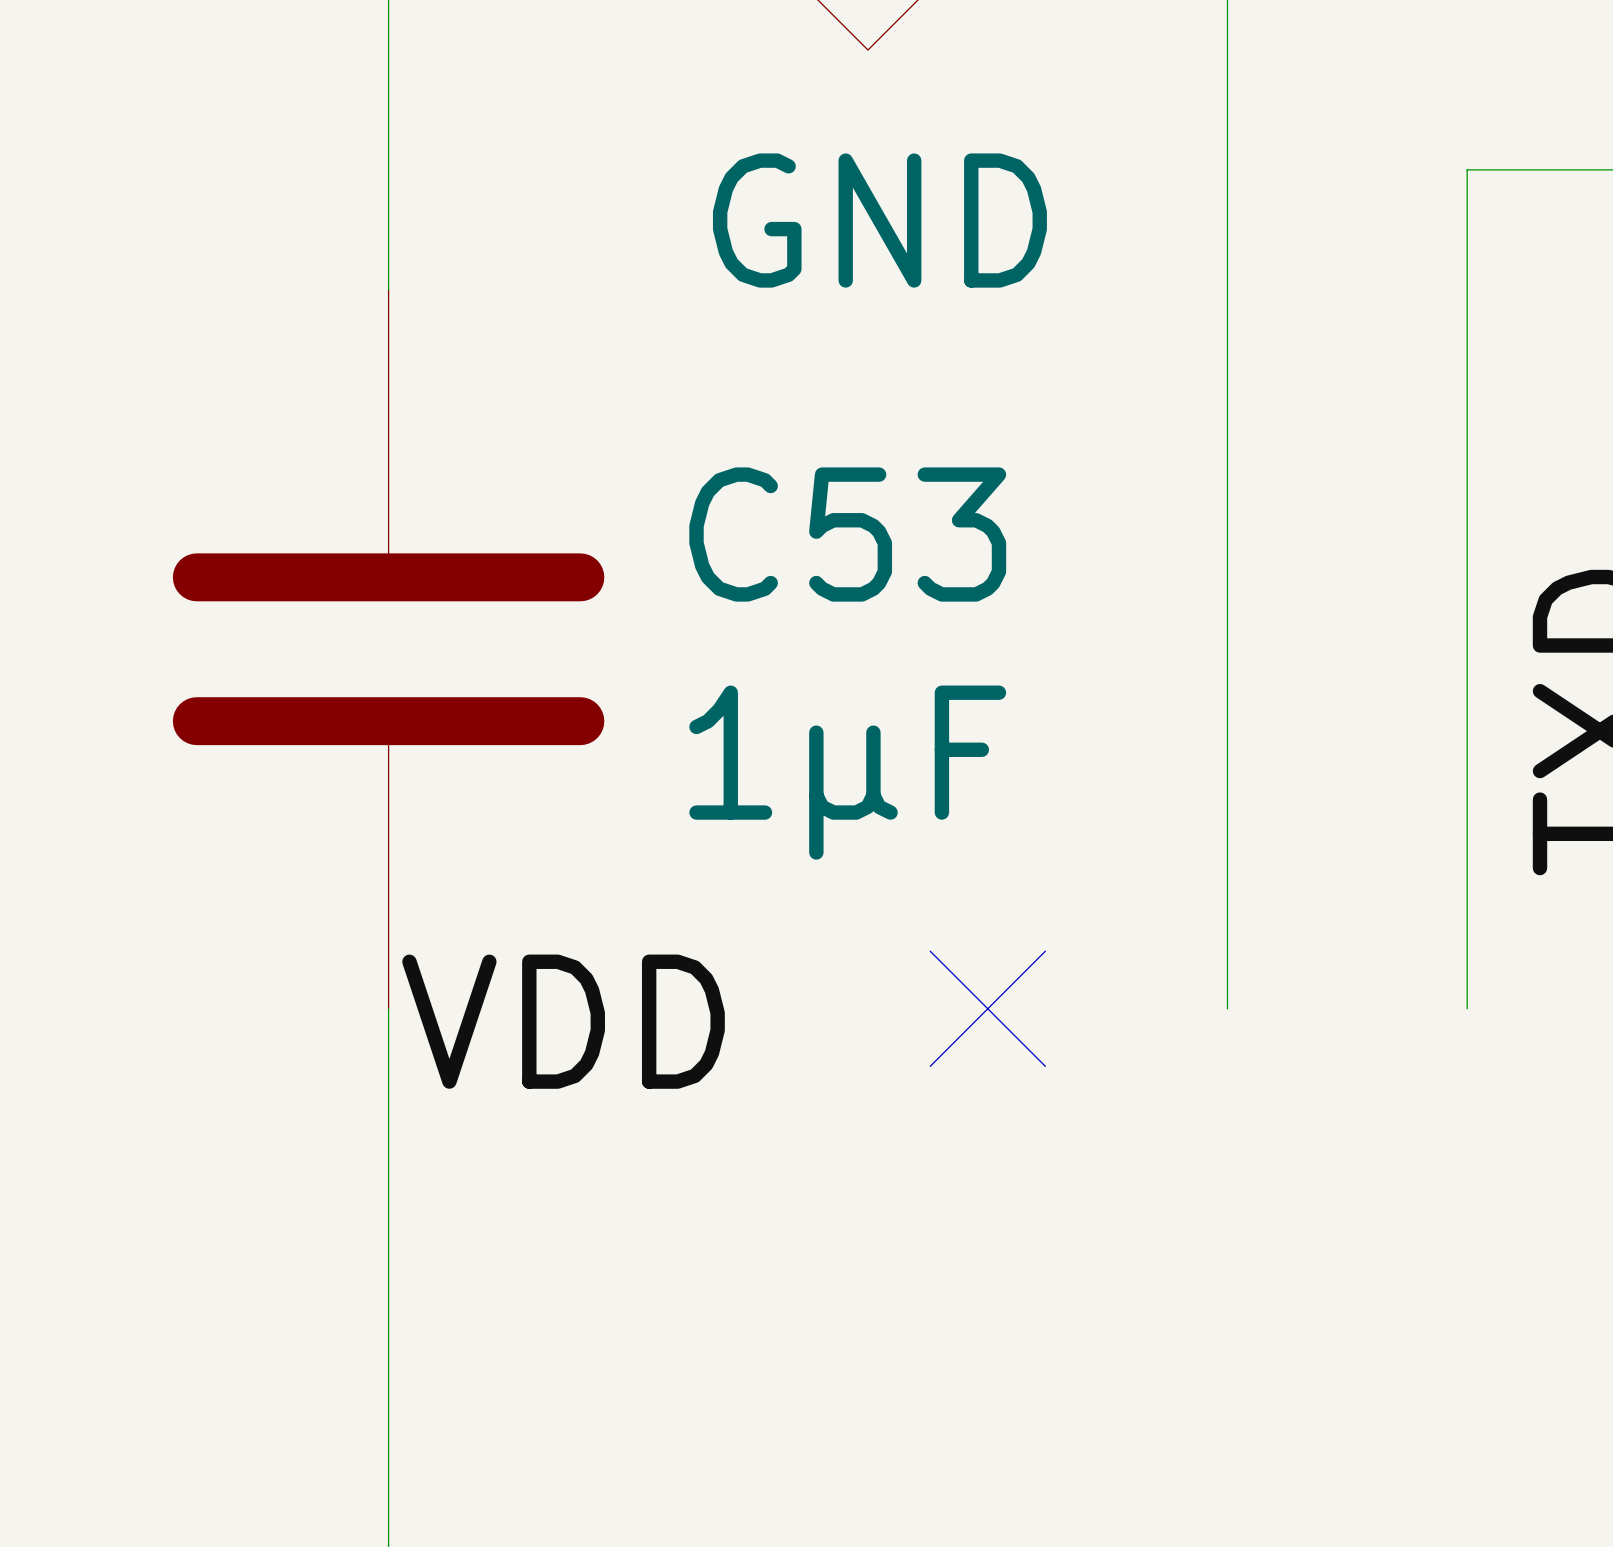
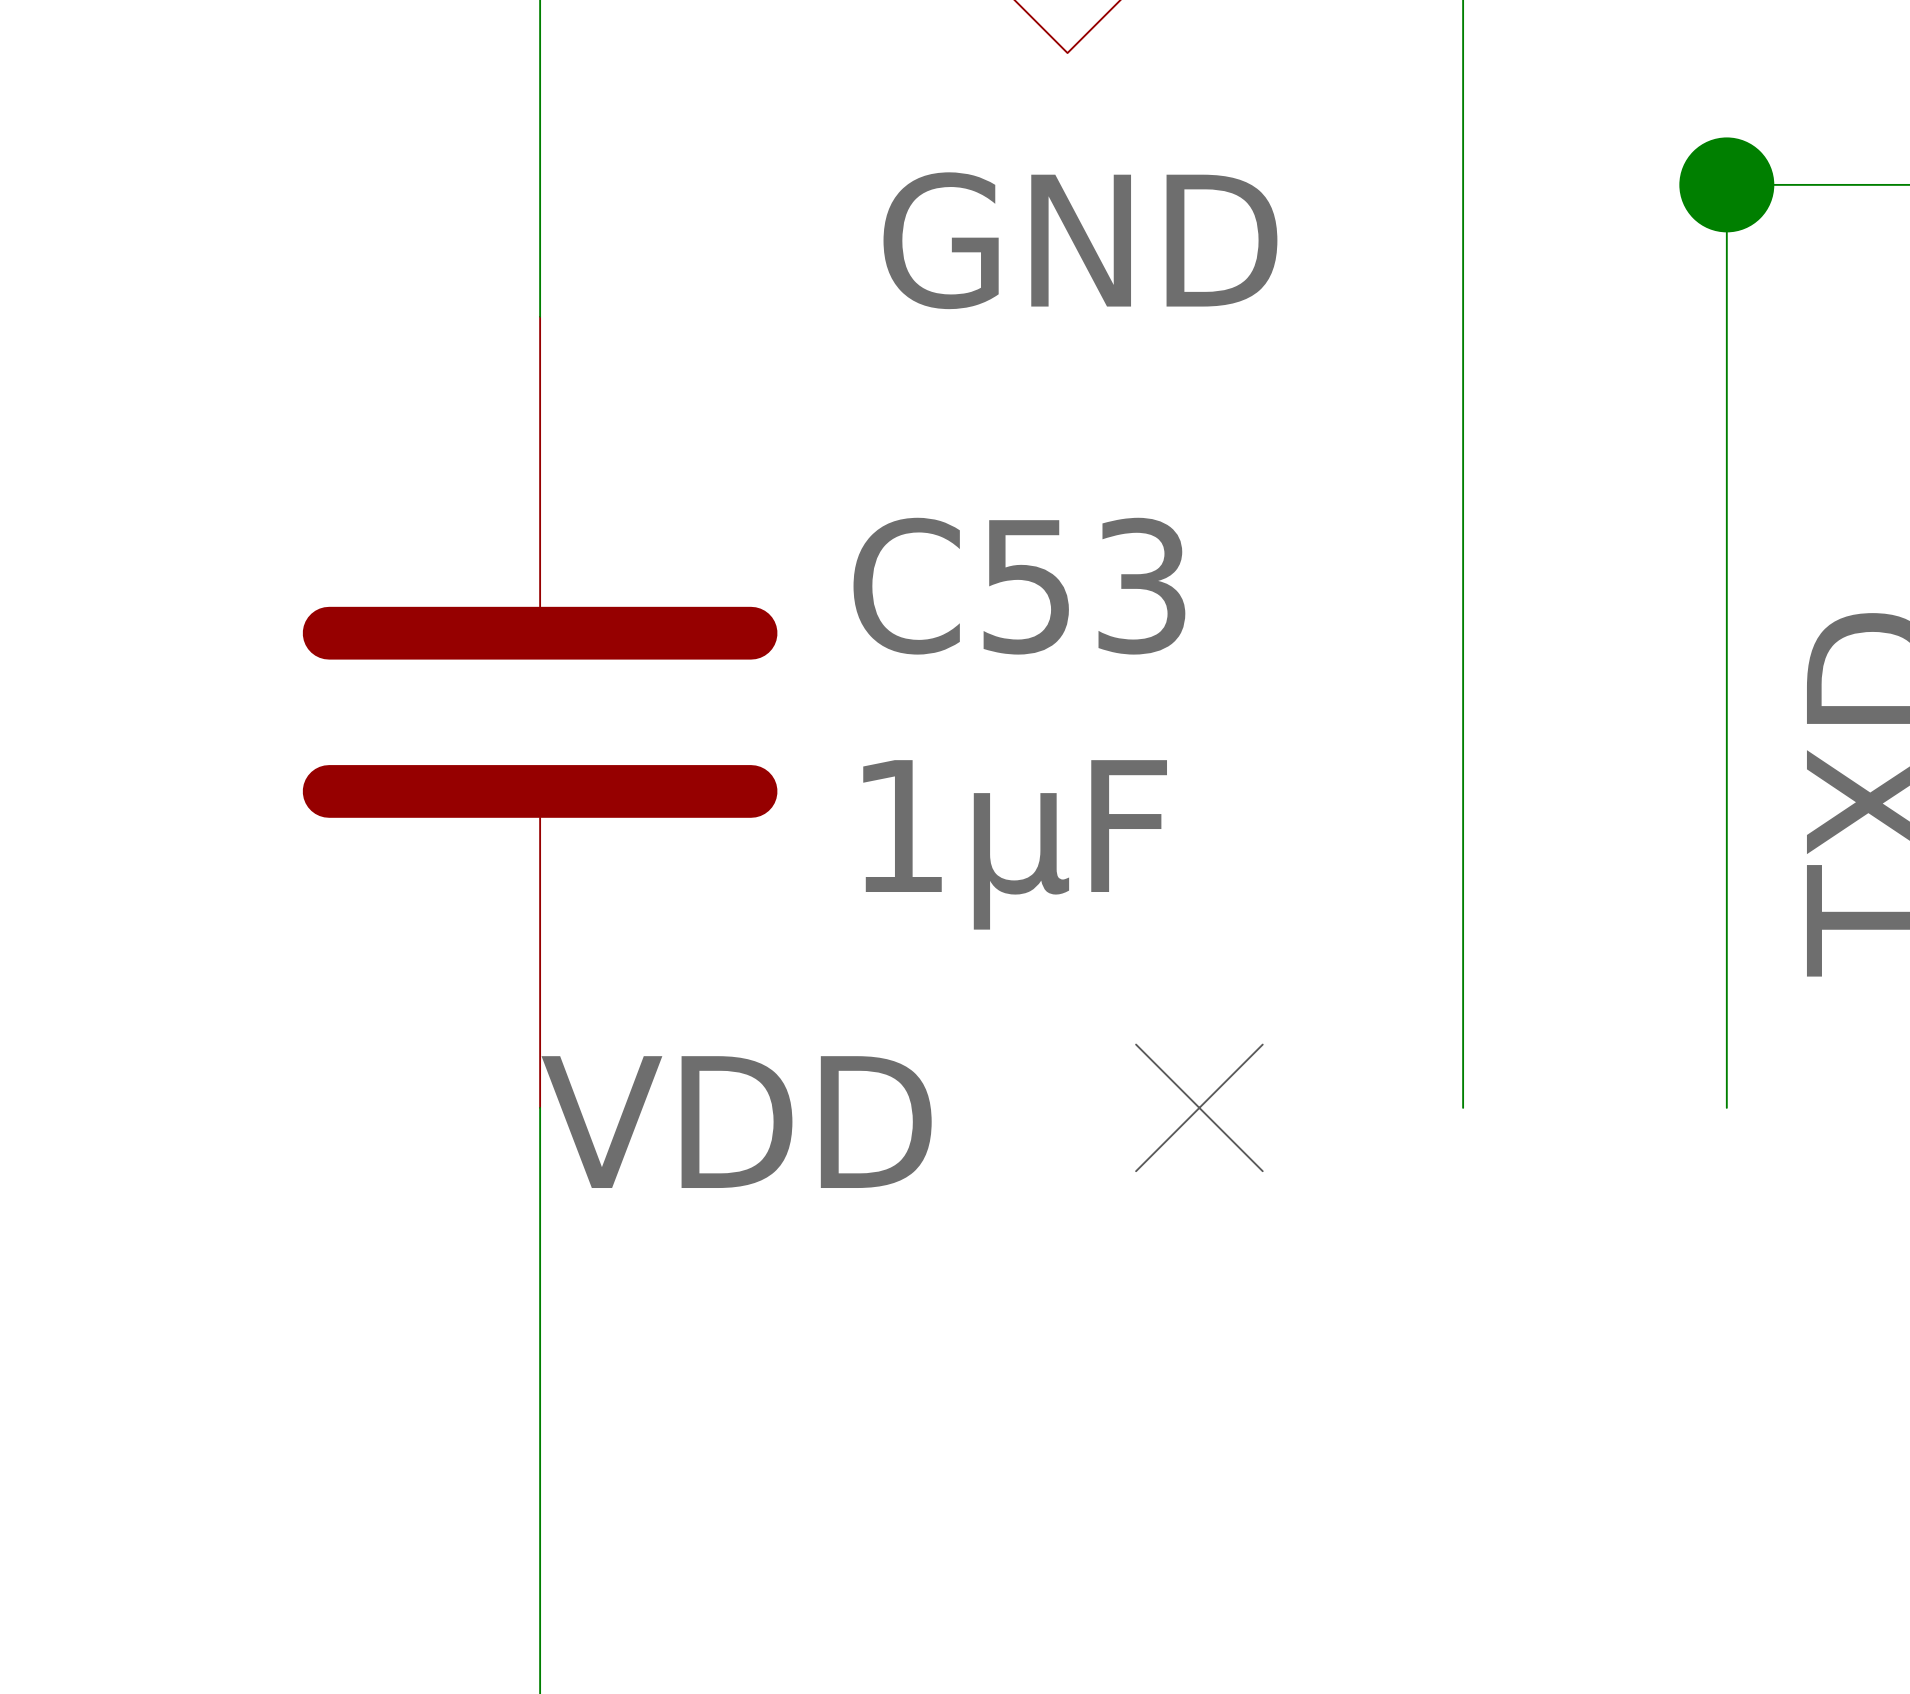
junction: none -> (1726, 184)

